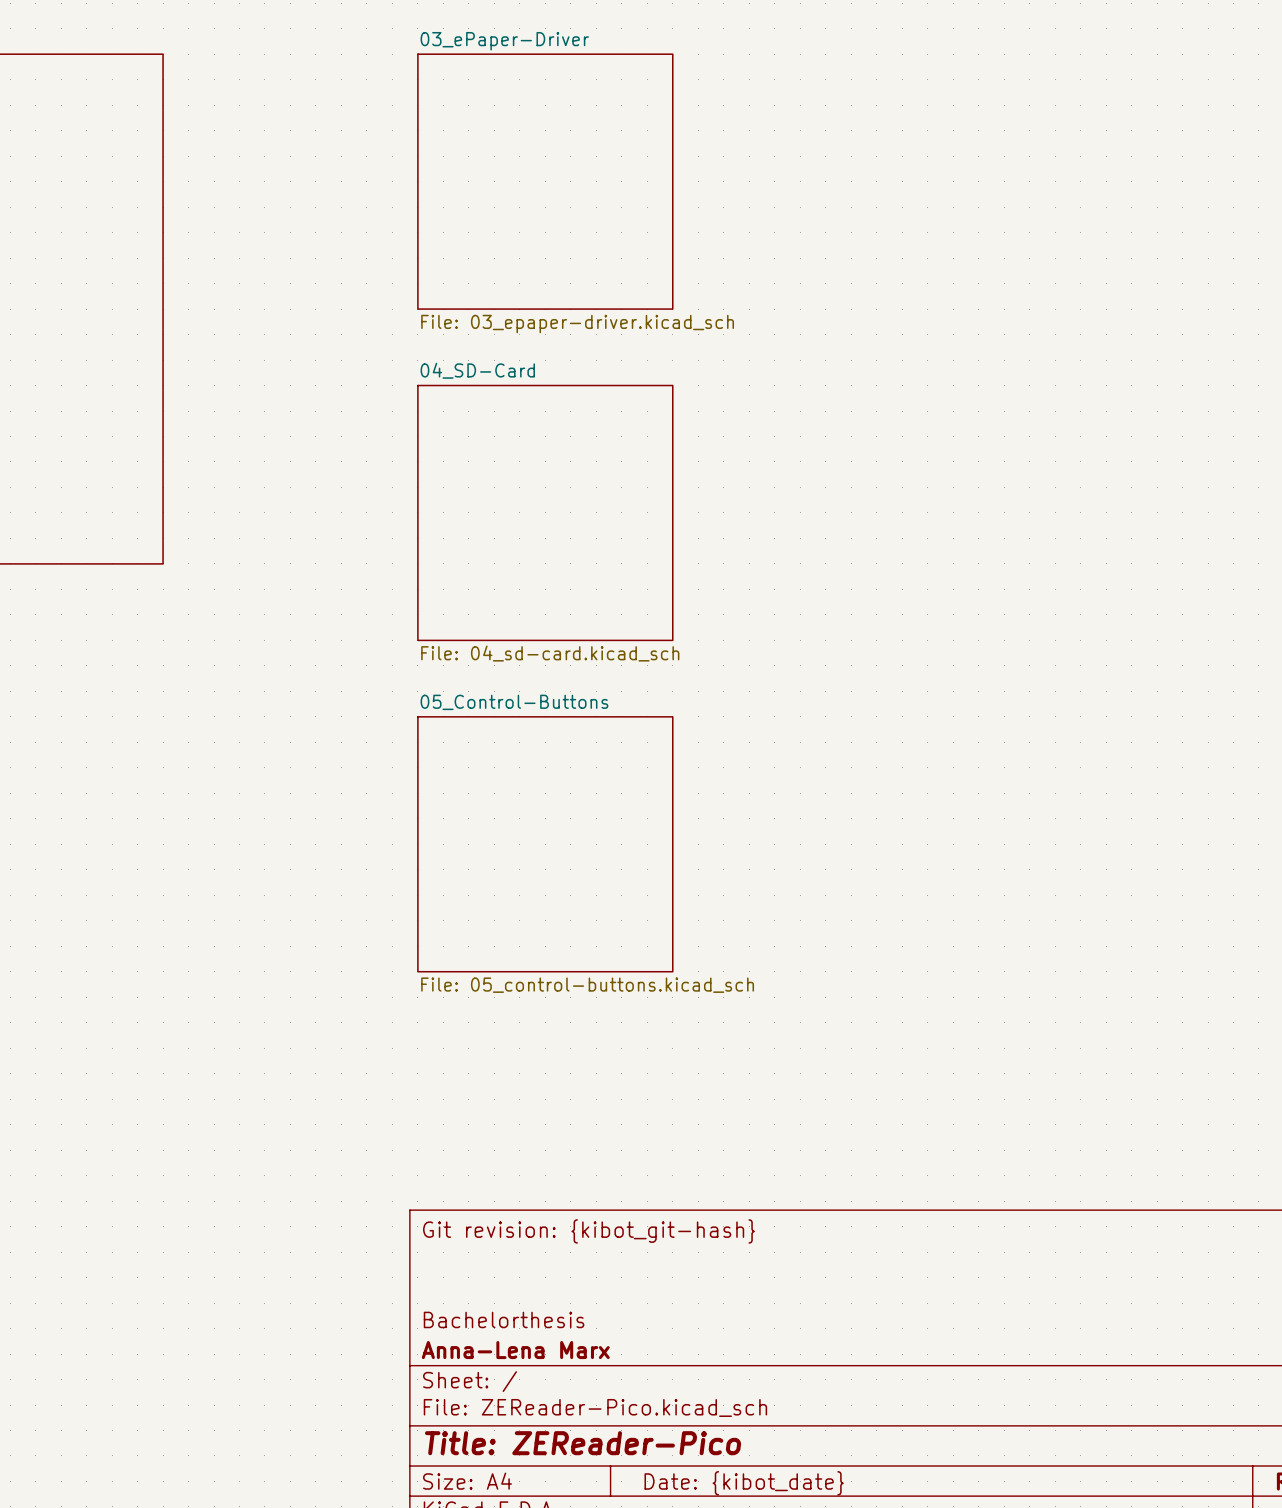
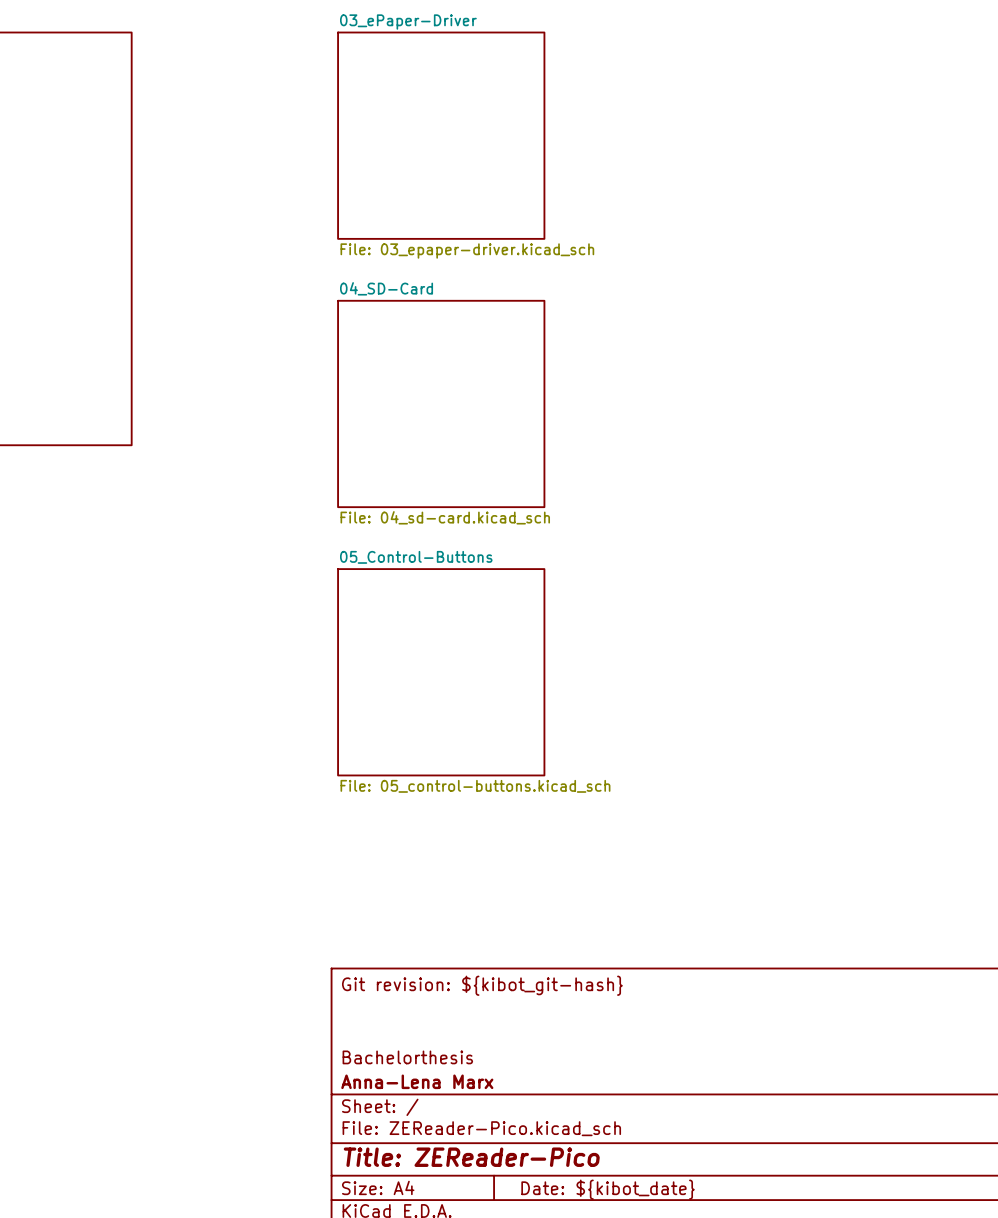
title block: Git revision: {kibot_git-hash} (588, 1231) -> Git revision: ${kibot_git-hash} (482, 985)
title block: Date: {kibot_date} (744, 1483) -> Date: ${kibot_date} (608, 1189)

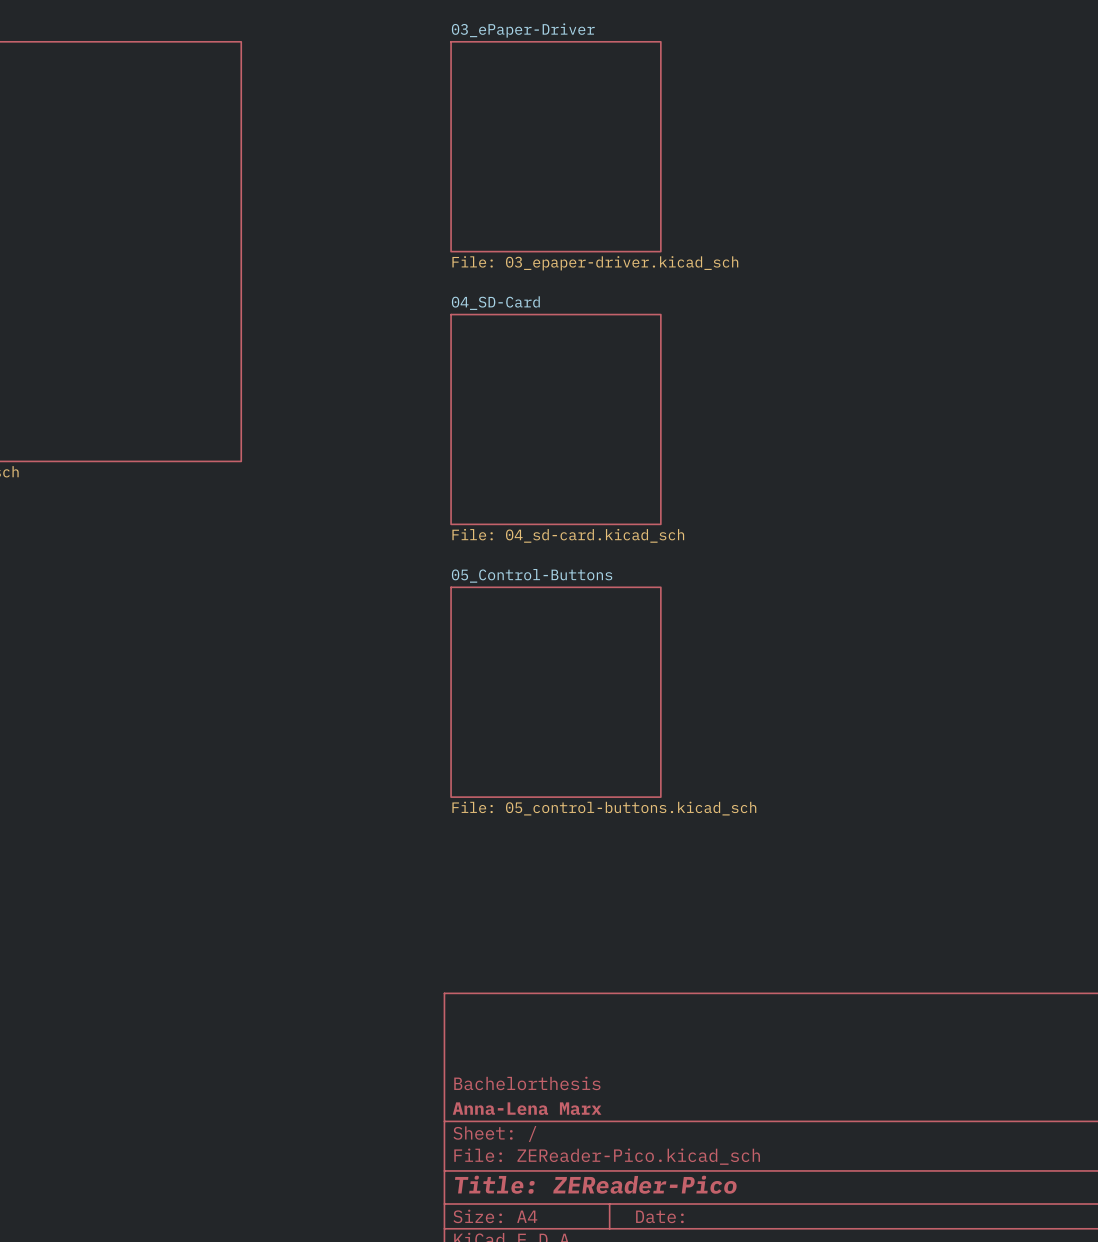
title block: Git revision: ${kibot_git-hash} (482, 985) -> none
title block: Date: ${kibot_date} (608, 1189) -> Date: (659, 1216)

